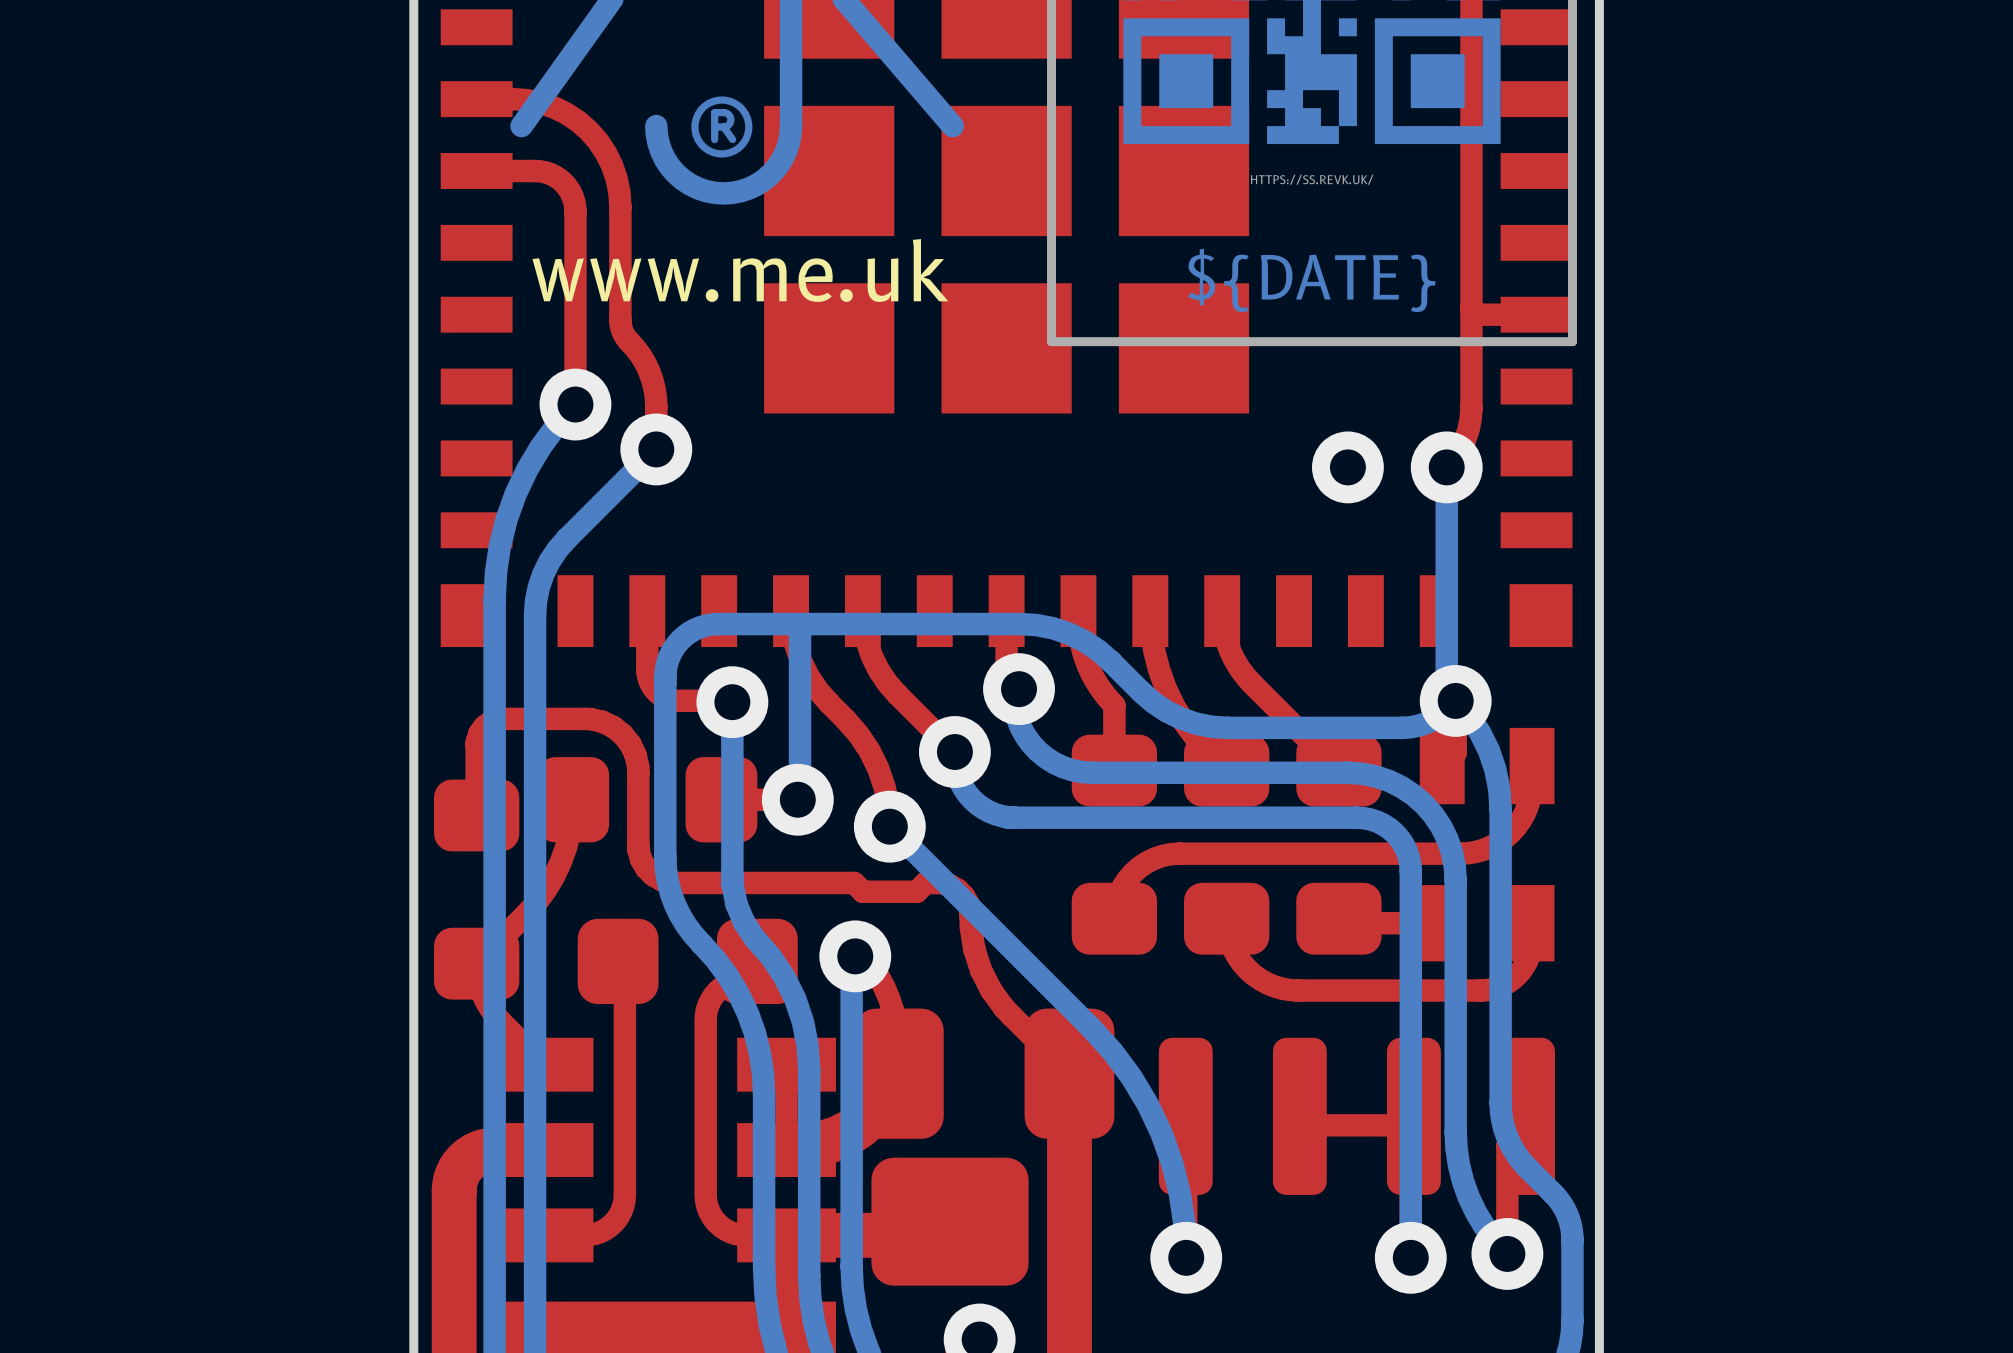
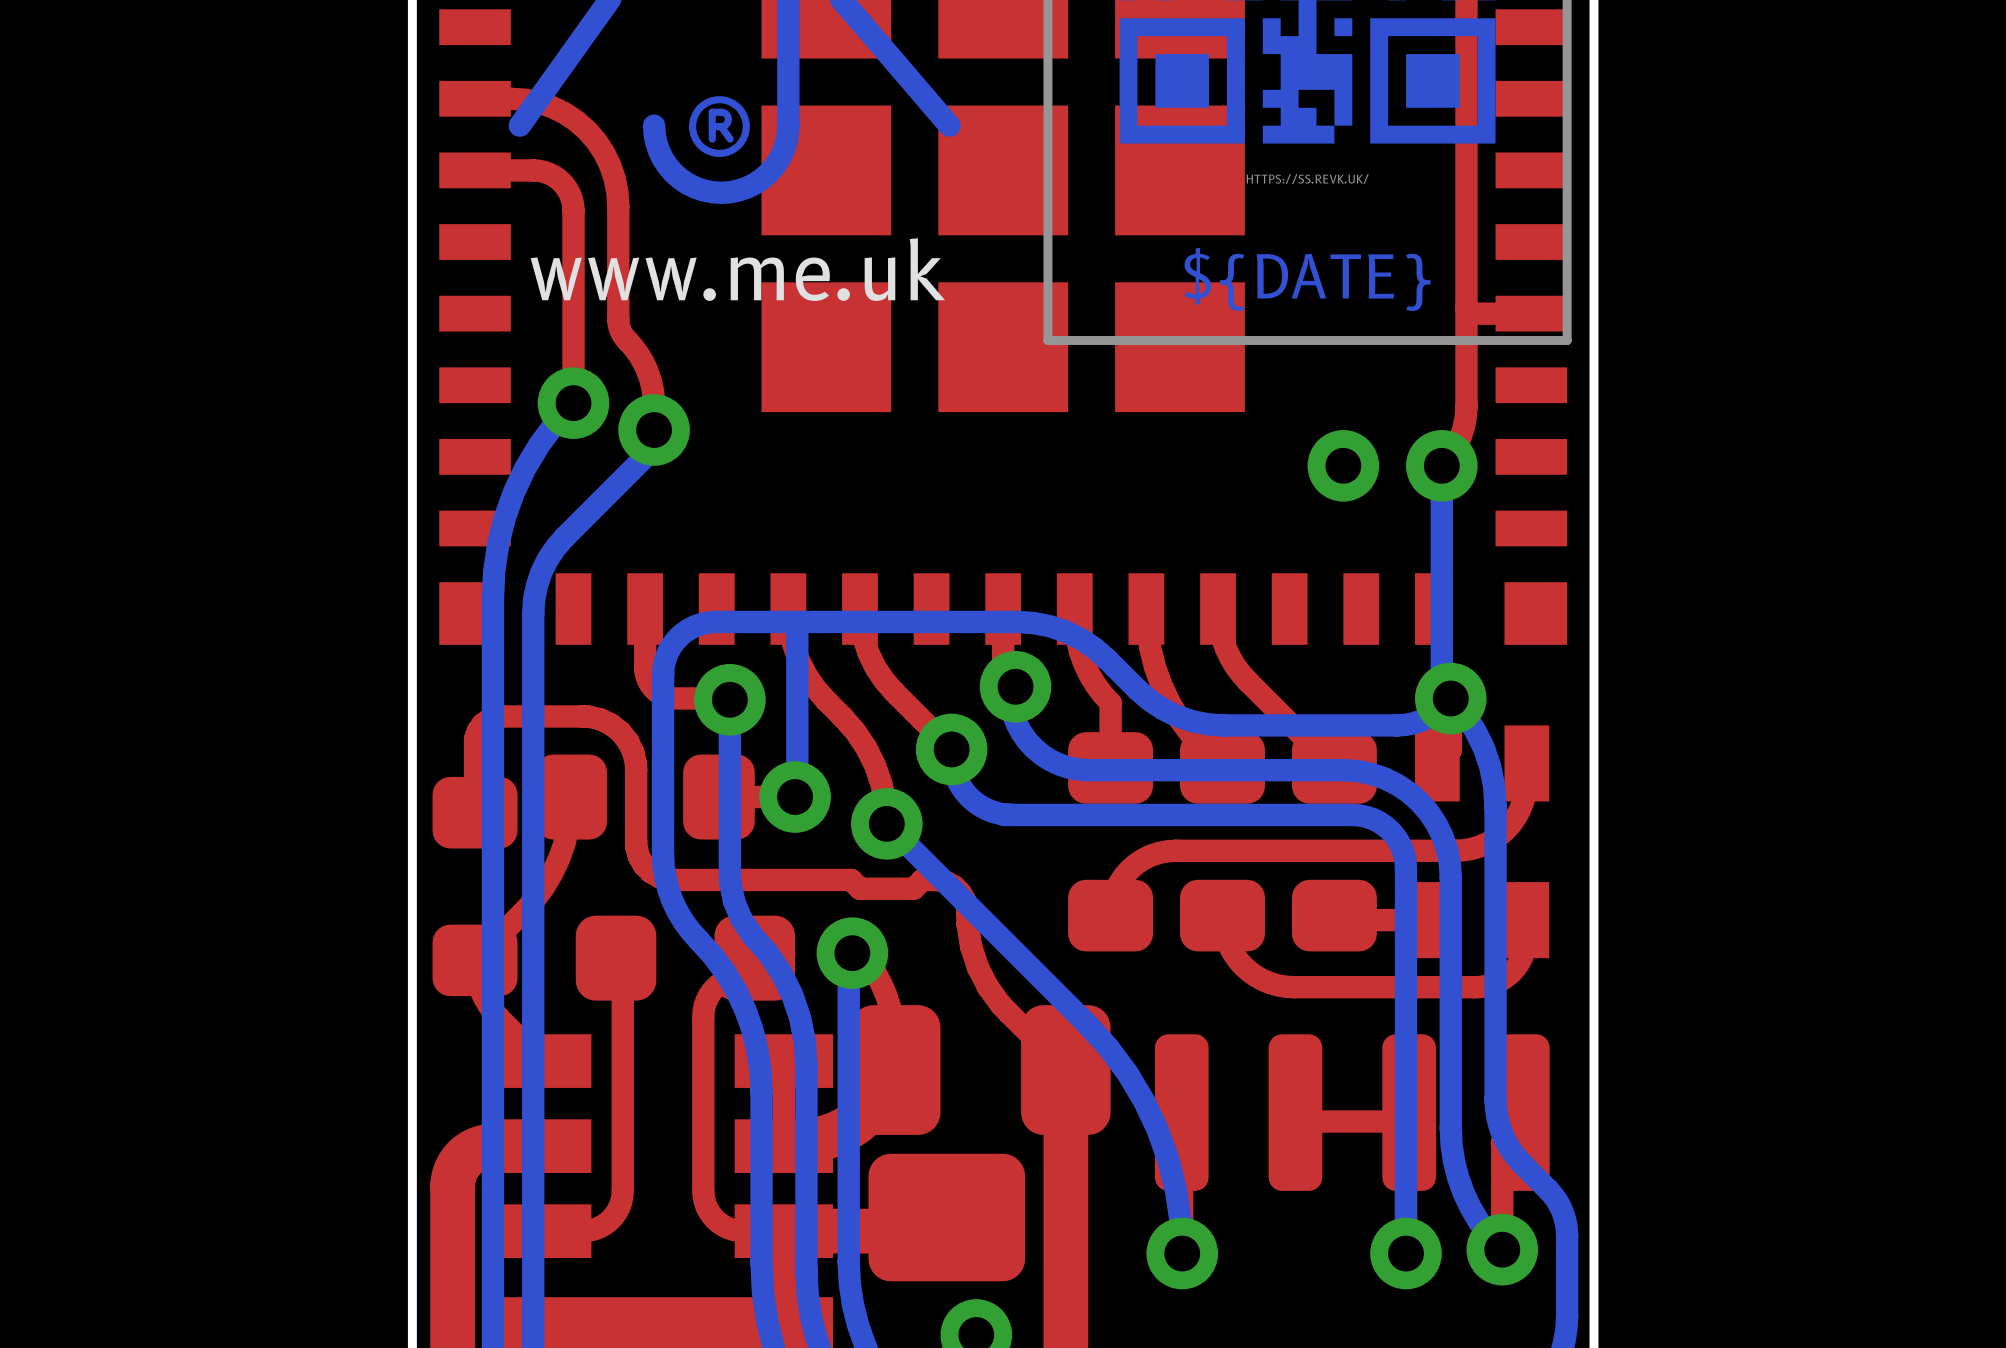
via position: (656, 449) -> (654, 430)

